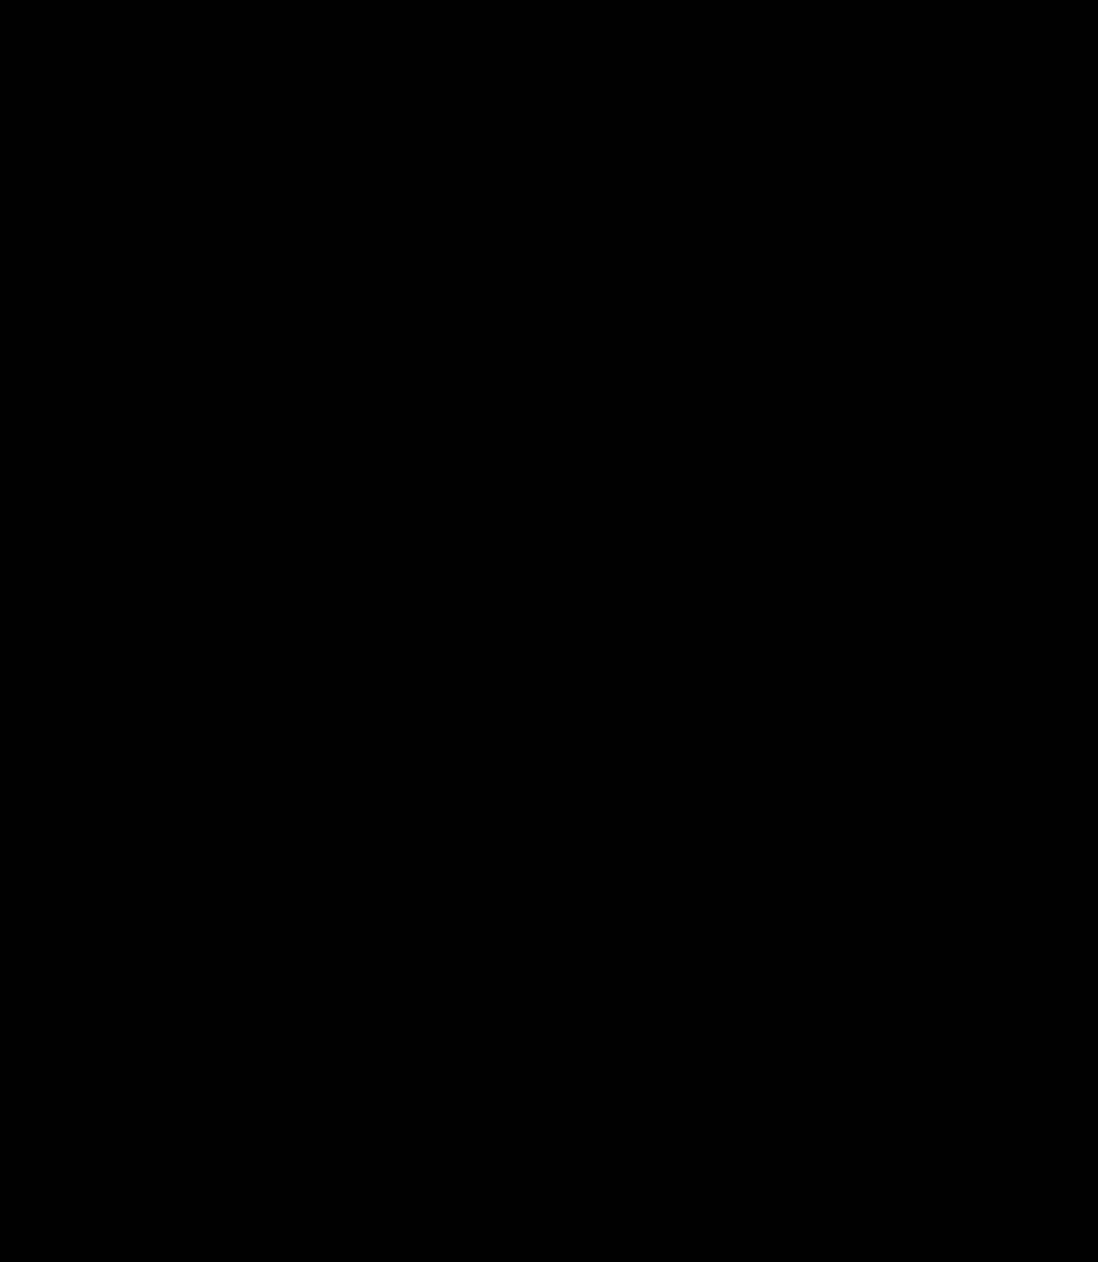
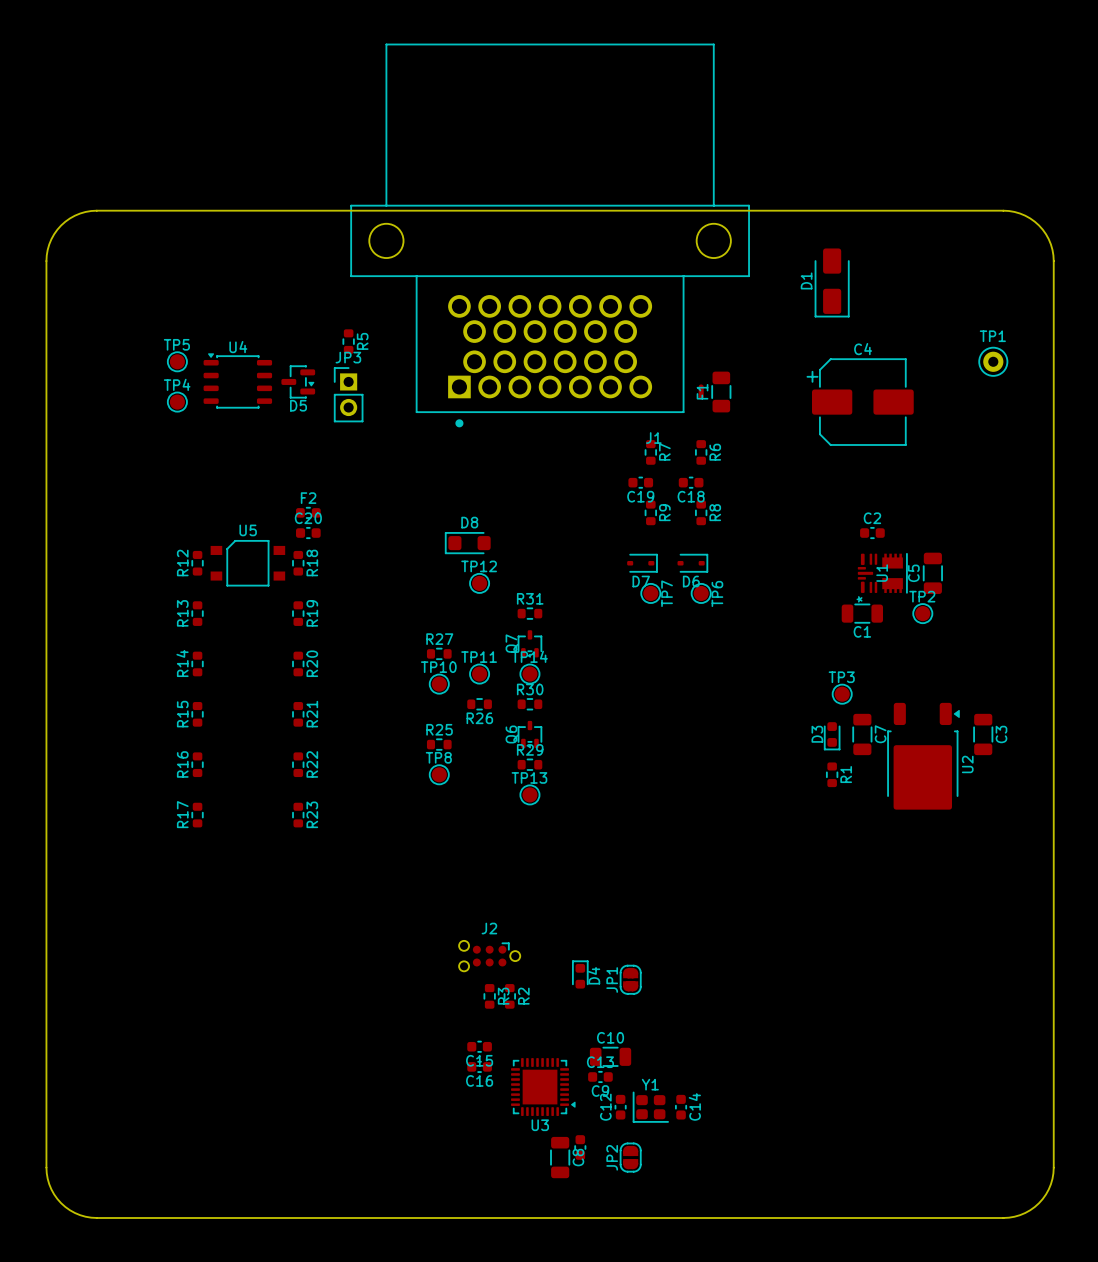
board edge: none -> (96, 210) (1003, 210) (1020, 213) (1038, 225) (1050, 244) (1053, 261) (1053, 1167) (1050, 1184) (1038, 1203) (1020, 1215) (1003, 1217) (96, 1217) (74, 1213) (61, 1203) (49, 1184) (46, 1167) (46, 261) (51, 239) (61, 225) (74, 215) (96, 210)
J1: none -> (550, 235)
D1: none -> (832, 282)
R5: none -> (348, 341)
TP5: none -> (177, 361)
TP1: none -> (993, 361)
U4: none -> (237, 380)
D5: none -> (298, 381)
part: none -> (701, 392)
F1: none -> (721, 392)
JP3: none -> (348, 394)
TP4: none -> (177, 402)
C4: none -> (860, 402)
R7: none -> (650, 452)
R6: none -> (701, 452)
C19: none -> (640, 482)
C18: none -> (691, 482)
F2: none -> (308, 512)
R9: none -> (650, 512)
R8: none -> (701, 512)
C20: none -> (308, 533)
C2: none -> (872, 533)
D8: none -> (467, 543)
R12: none -> (197, 563)
U5: none -> (247, 563)
R18: none -> (298, 563)
D7: none -> (642, 563)
D6: none -> (692, 563)
U1: none -> (882, 573)
C5: none -> (932, 573)
TP12: none -> (479, 583)
TP7: none -> (650, 593)
TP6: none -> (701, 593)
R13: none -> (197, 613)
R19: none -> (298, 613)
R31: none -> (529, 613)
C1: none -> (862, 613)
TP2: none -> (922, 613)
Q7: none -> (529, 643)
R27: none -> (439, 653)
R14: none -> (197, 663)
R20: none -> (298, 663)
TP11: none -> (479, 674)
TP14: none -> (529, 674)
TP10: none -> (439, 684)
TP3: none -> (842, 694)
R26: none -> (479, 704)
R30: none -> (529, 704)
R15: none -> (197, 714)
R21: none -> (298, 714)
Q6: none -> (529, 734)
C7: none -> (862, 734)
C3: none -> (983, 734)
D3: none -> (832, 736)
R25: none -> (439, 744)
U2: none -> (923, 756)
R16: none -> (197, 764)
R22: none -> (298, 764)
R29: none -> (529, 764)
TP8: none -> (439, 774)
R1: none -> (832, 774)
TP13: none -> (529, 794)
R17: none -> (197, 815)
R23: none -> (298, 815)
J2: none -> (489, 956)
D4: none -> (580, 974)
JP1: none -> (630, 979)
R3: none -> (489, 996)
R2: none -> (509, 996)
C15: none -> (479, 1046)
C10: none -> (610, 1056)
C16: none -> (479, 1066)
C13: none -> (600, 1076)
U3: none -> (543, 1087)
C12: none -> (620, 1107)
Y1: none -> (650, 1107)
C14: none -> (681, 1107)
C9: none -> (580, 1147)
C8: none -> (560, 1157)
JP2: none -> (630, 1157)

